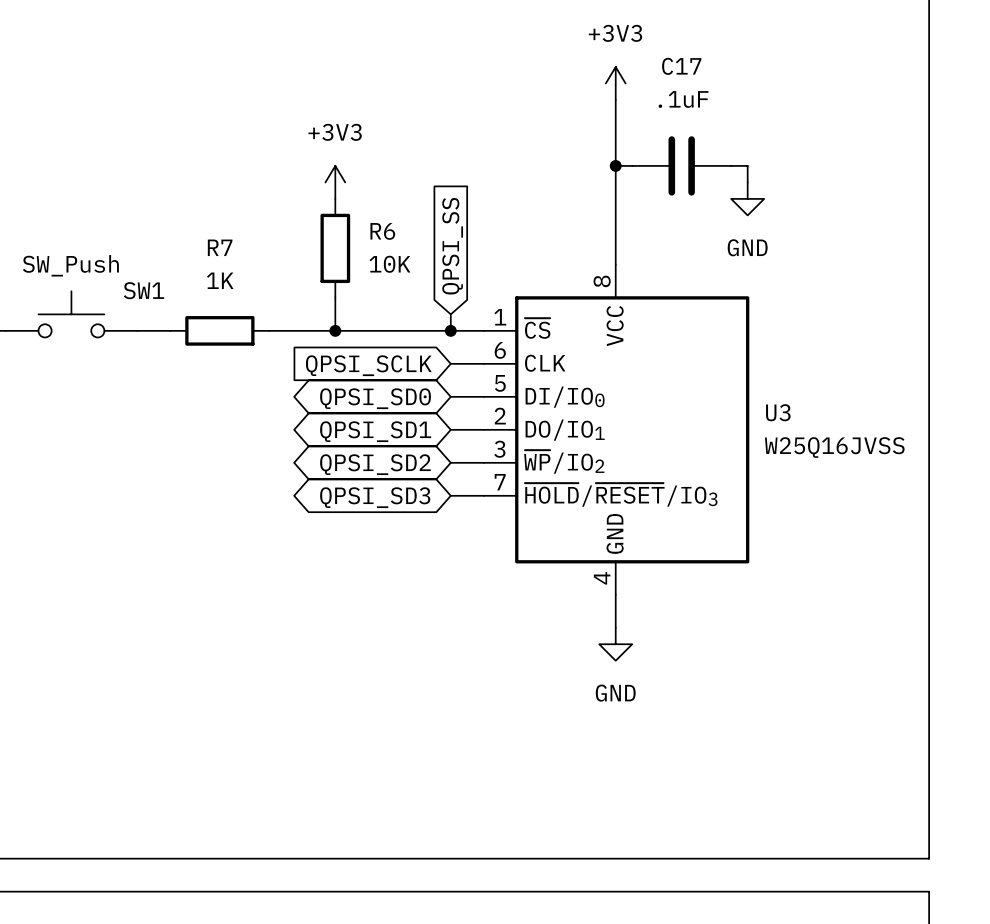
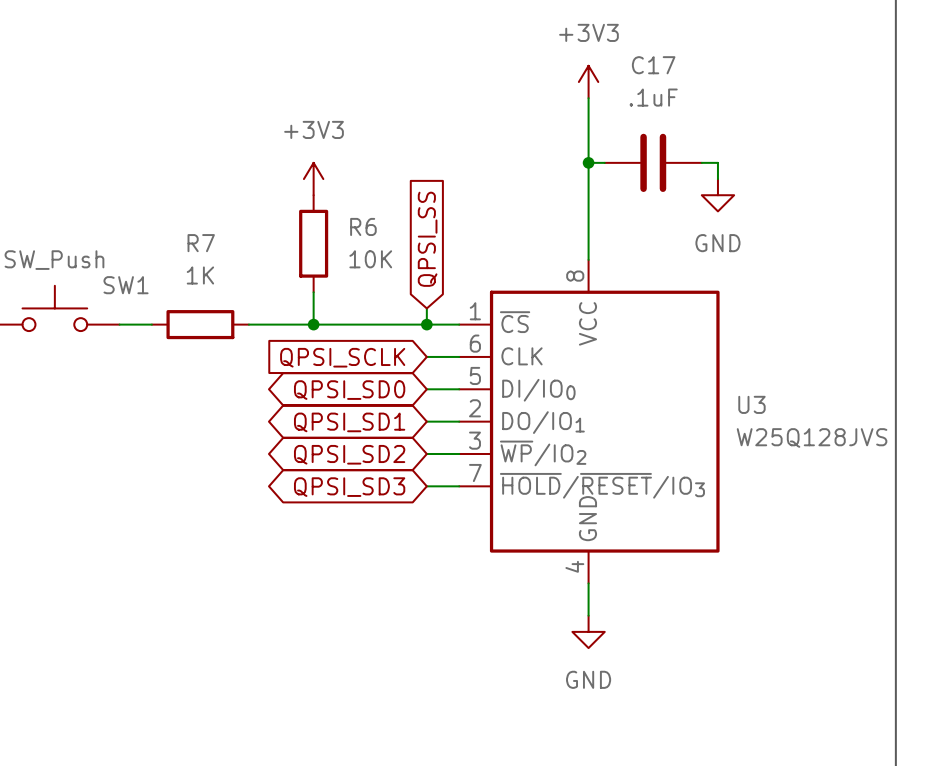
U3 value: W25Q16JVSS (834, 447) -> W25Q128JVS (812, 437)

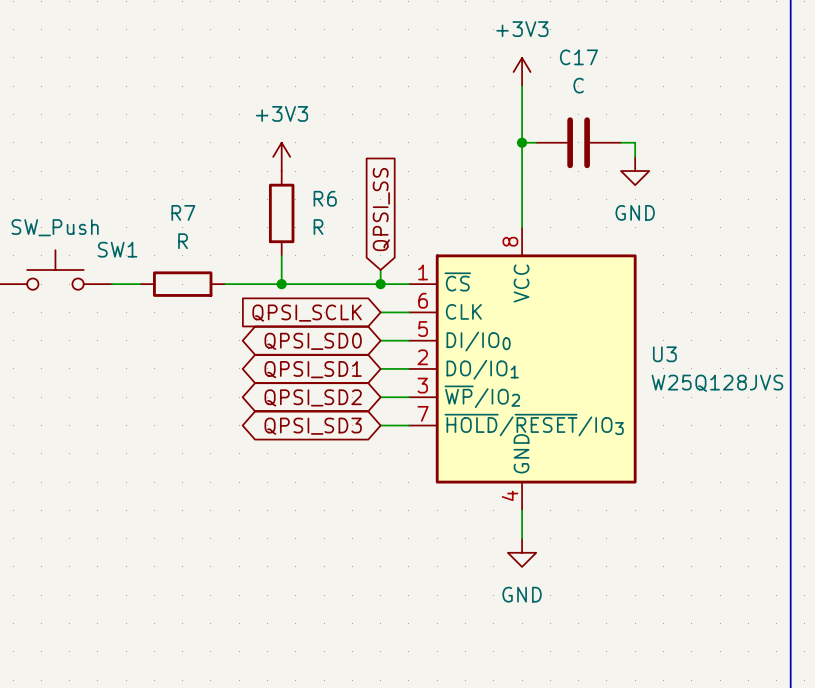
C17 value: .1uF (653, 97) -> C (578, 85)
R6 value: 10K (370, 259) -> R (318, 227)
R7 value: 1K (200, 275) -> R (183, 241)

